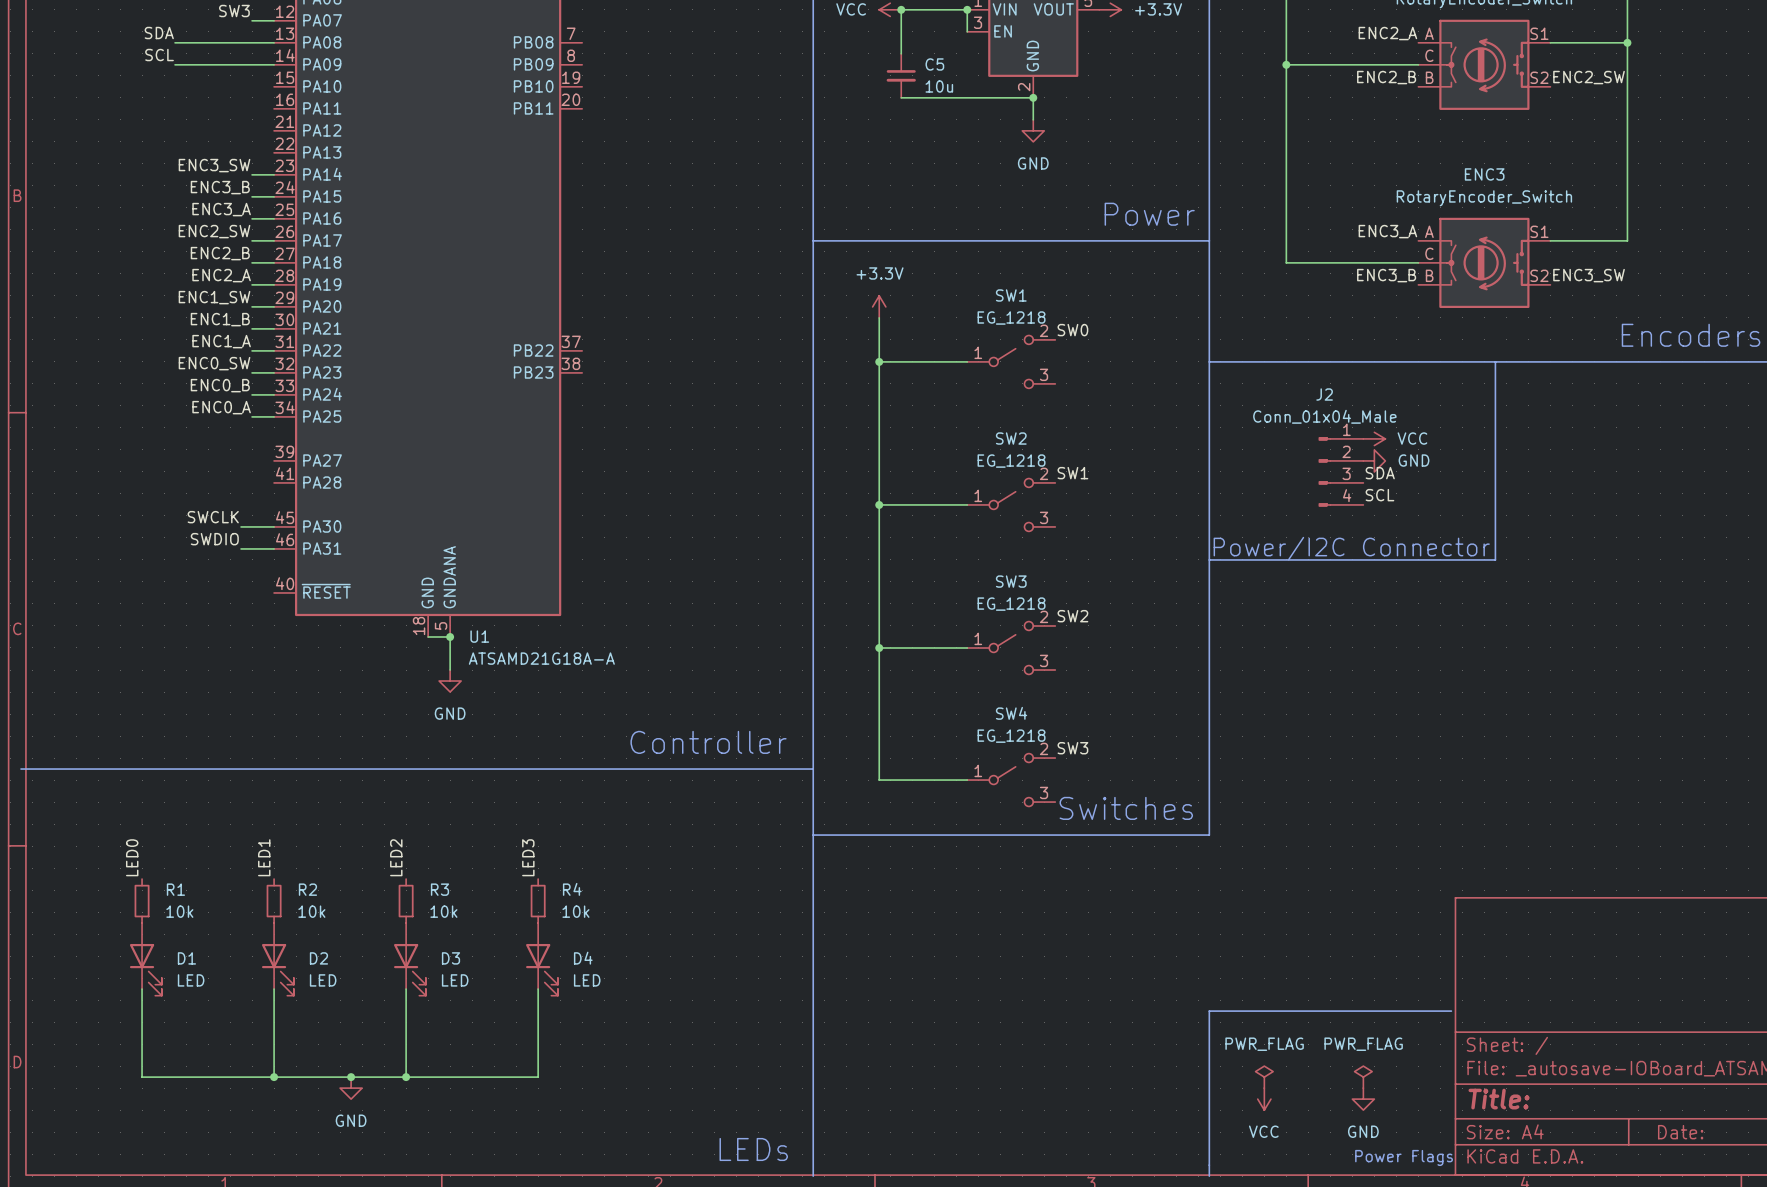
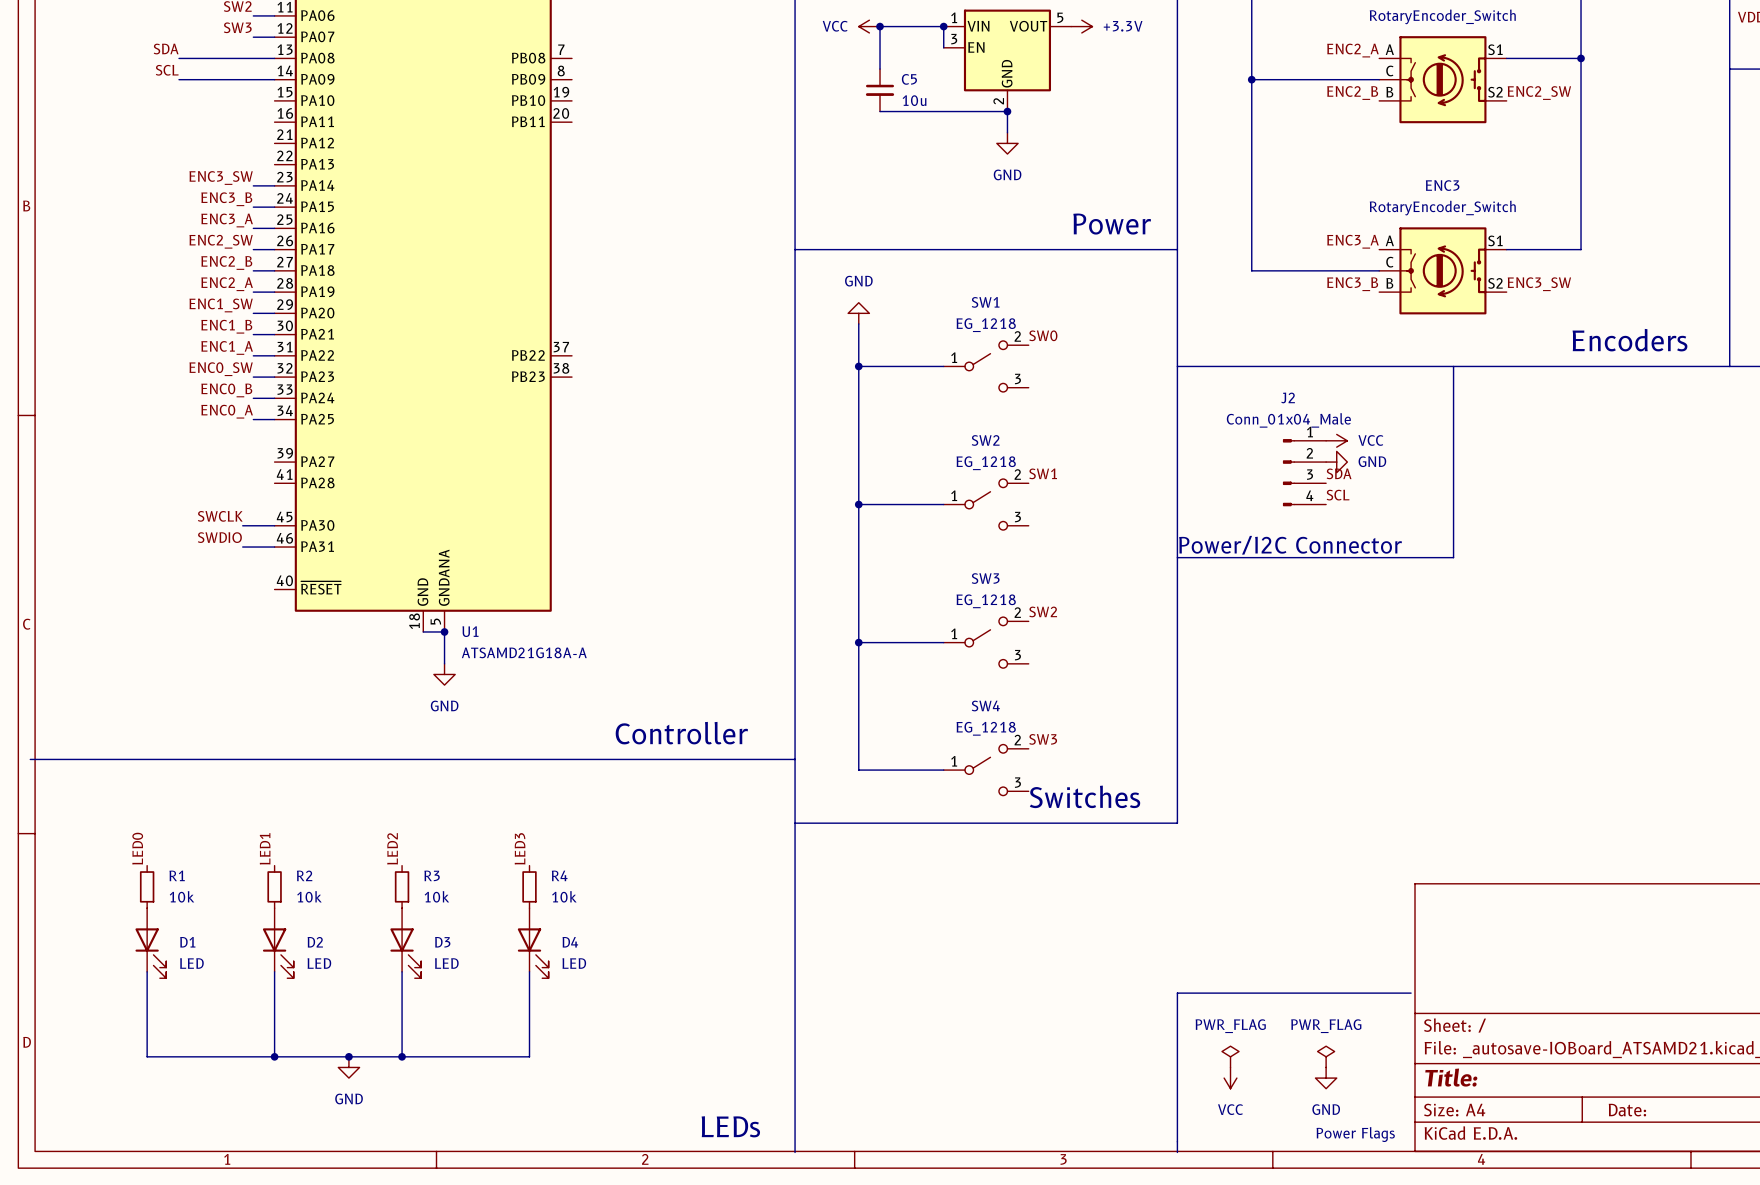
power symbol: +3.3V (879, 306) -> GND (858, 313)

